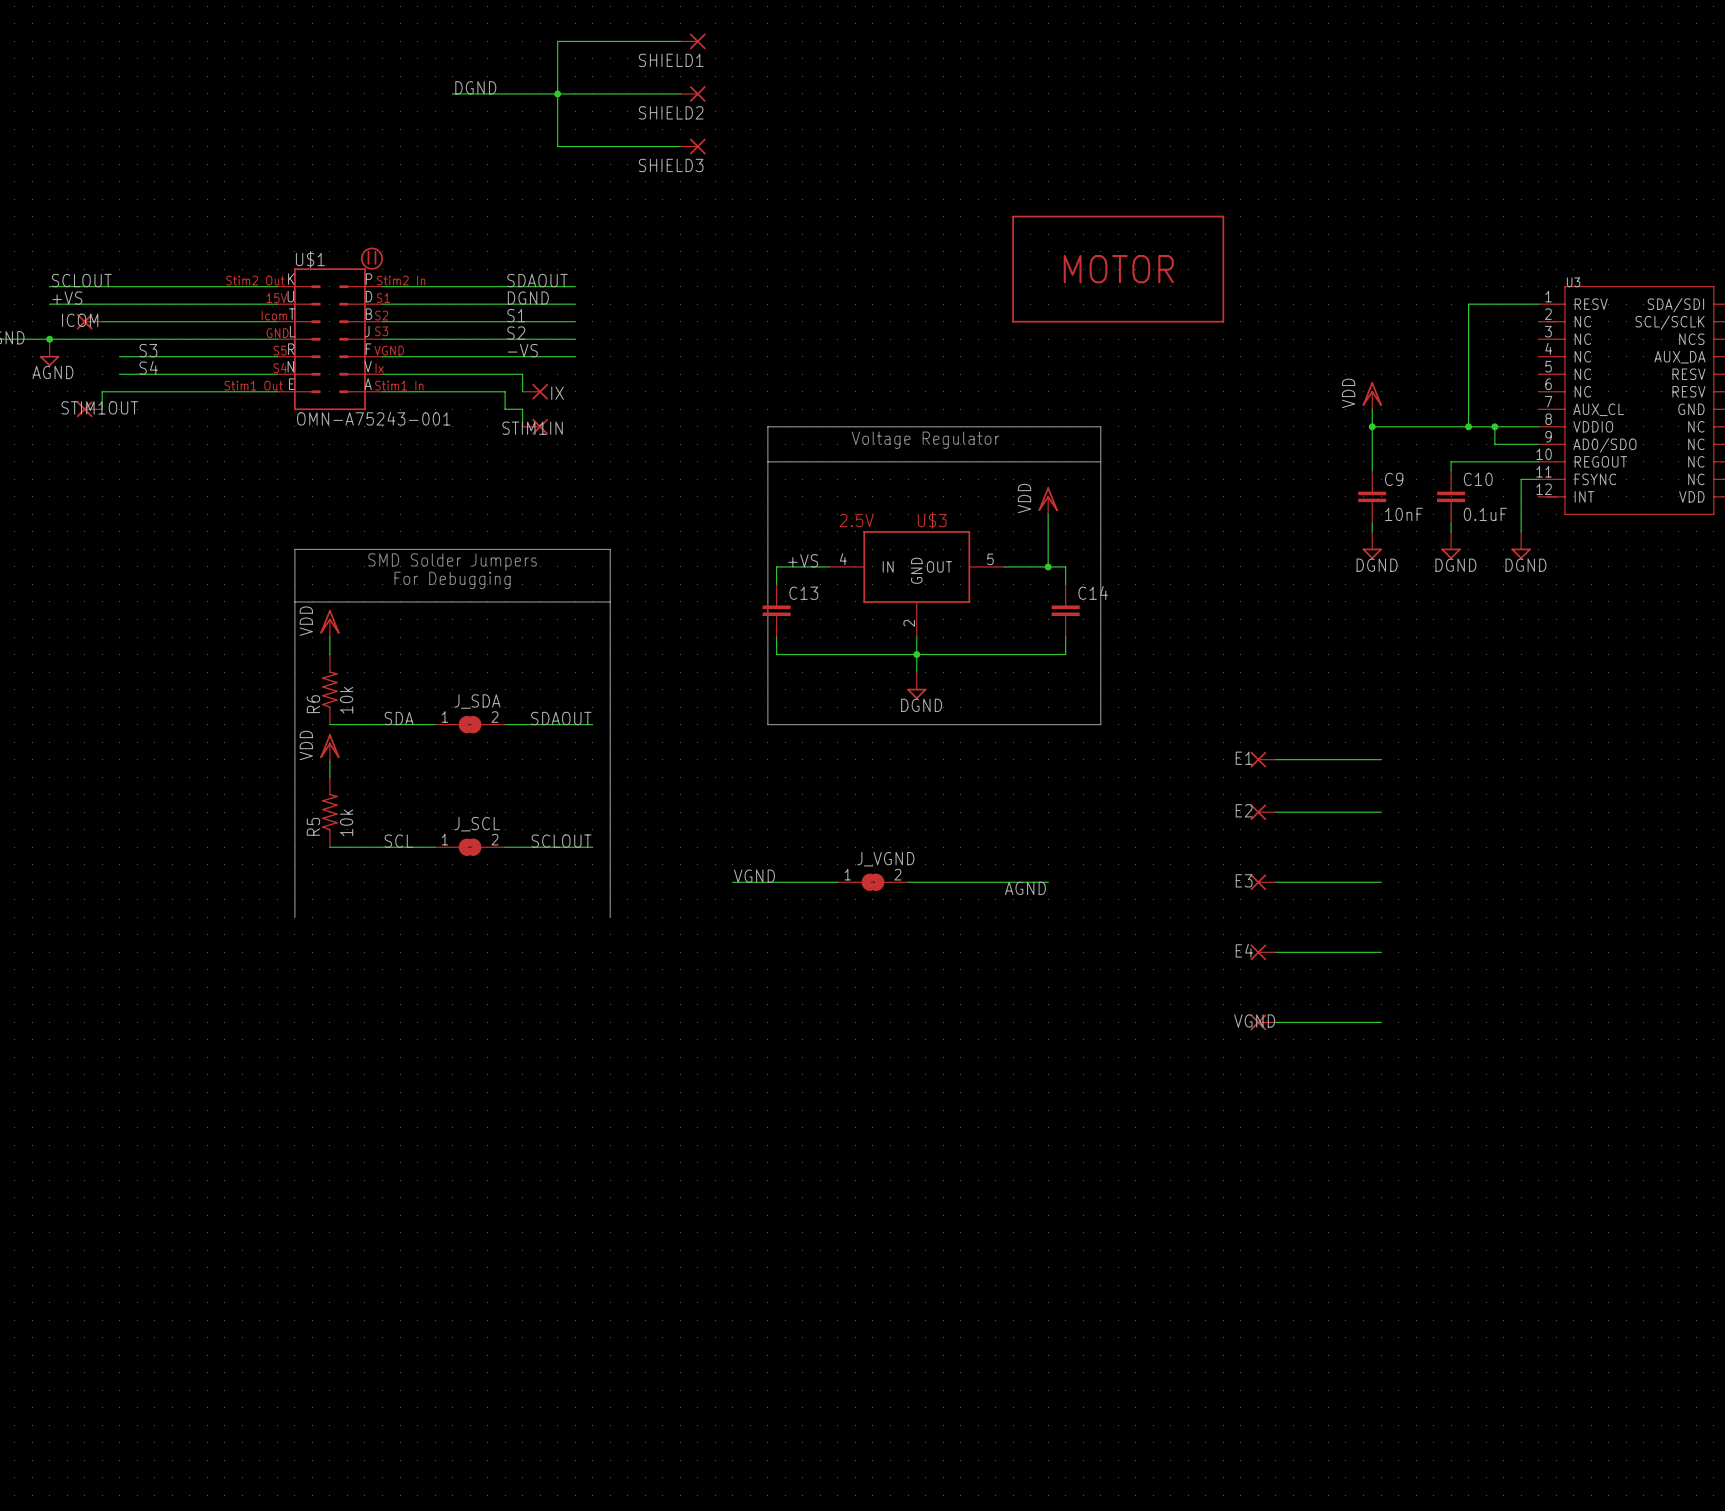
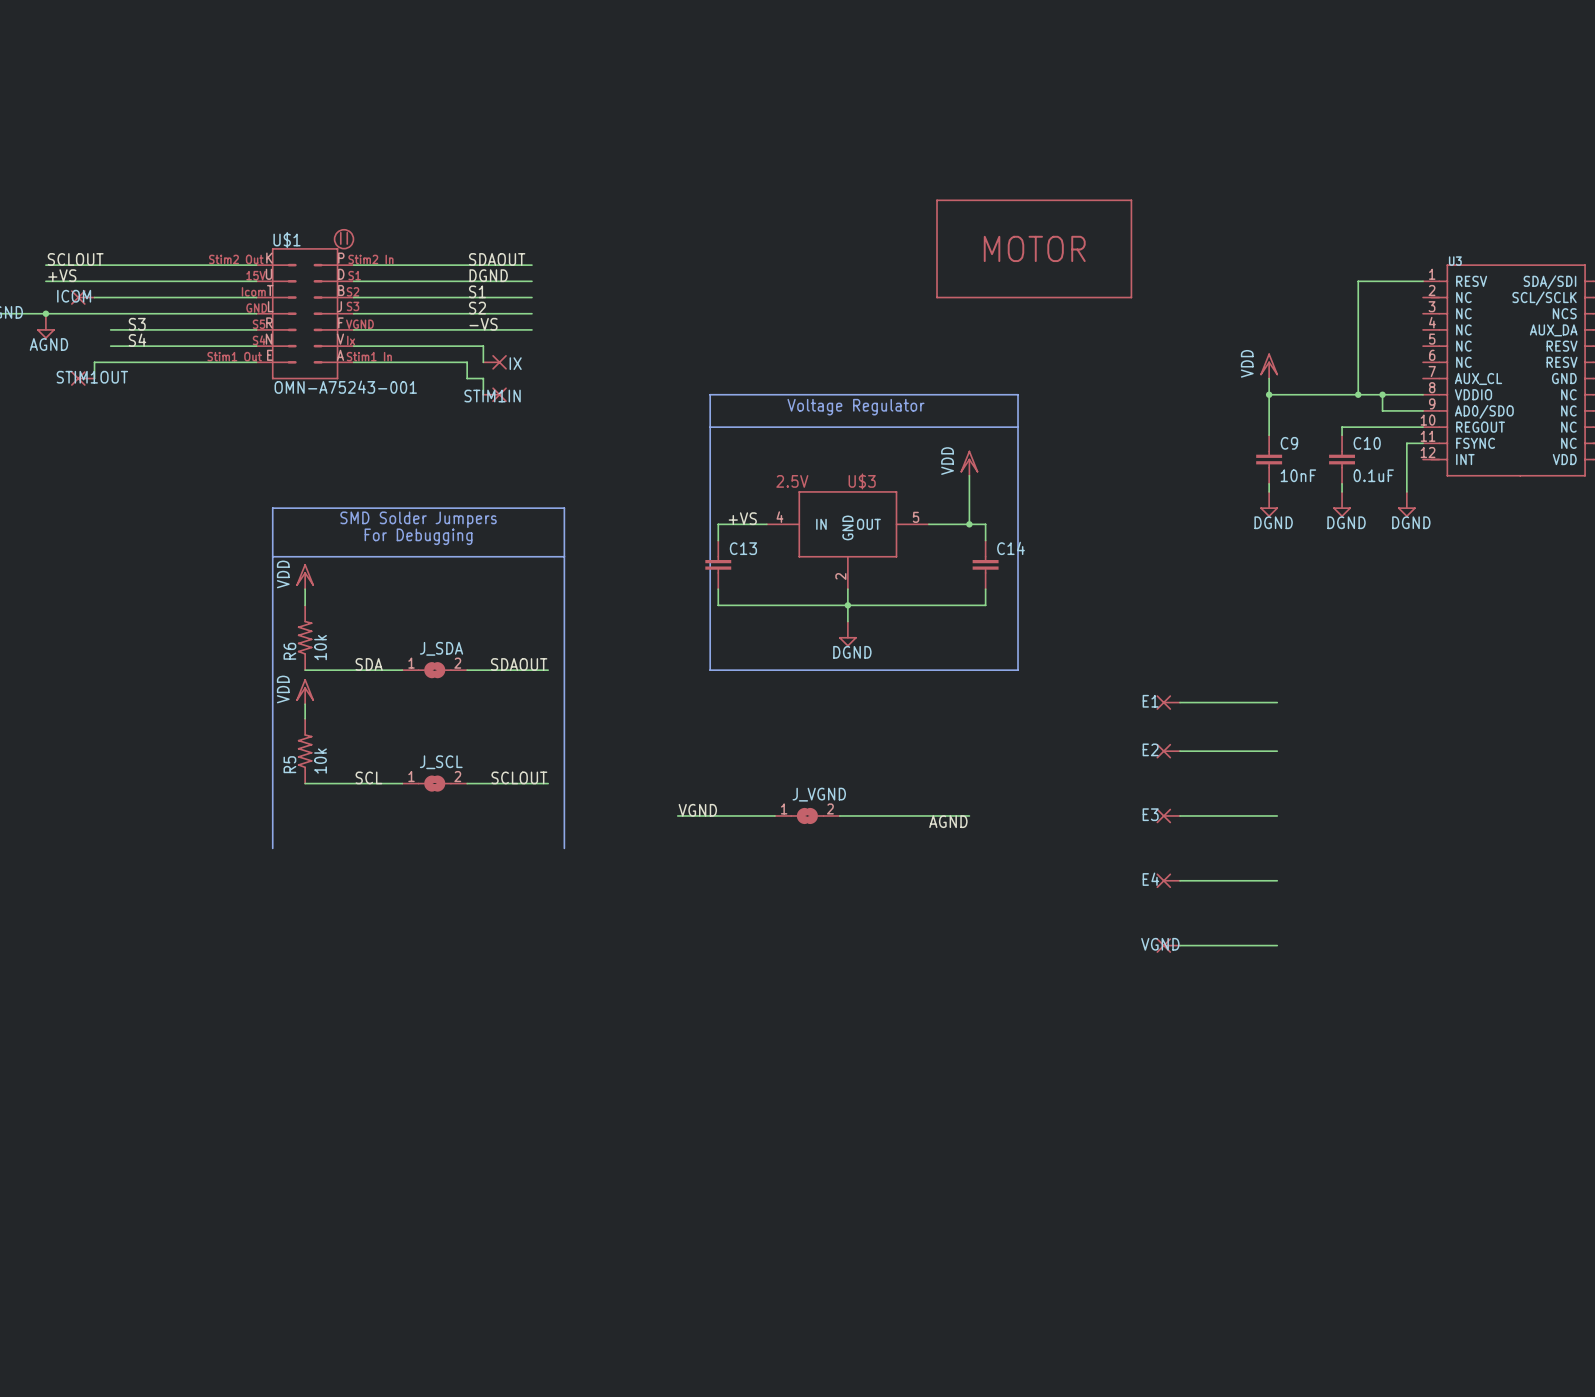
wire: (680, 41) (557, 41) (557, 146) (680, 146) -> none
SHIELD1: (692, 41) -> none
label: DGND (475, 87) -> none
wire: (452, 93) (680, 93) -> none
junction: (557, 93) -> none
SHIELD2: (692, 93) -> none
SHIELD3: (692, 146) -> none

